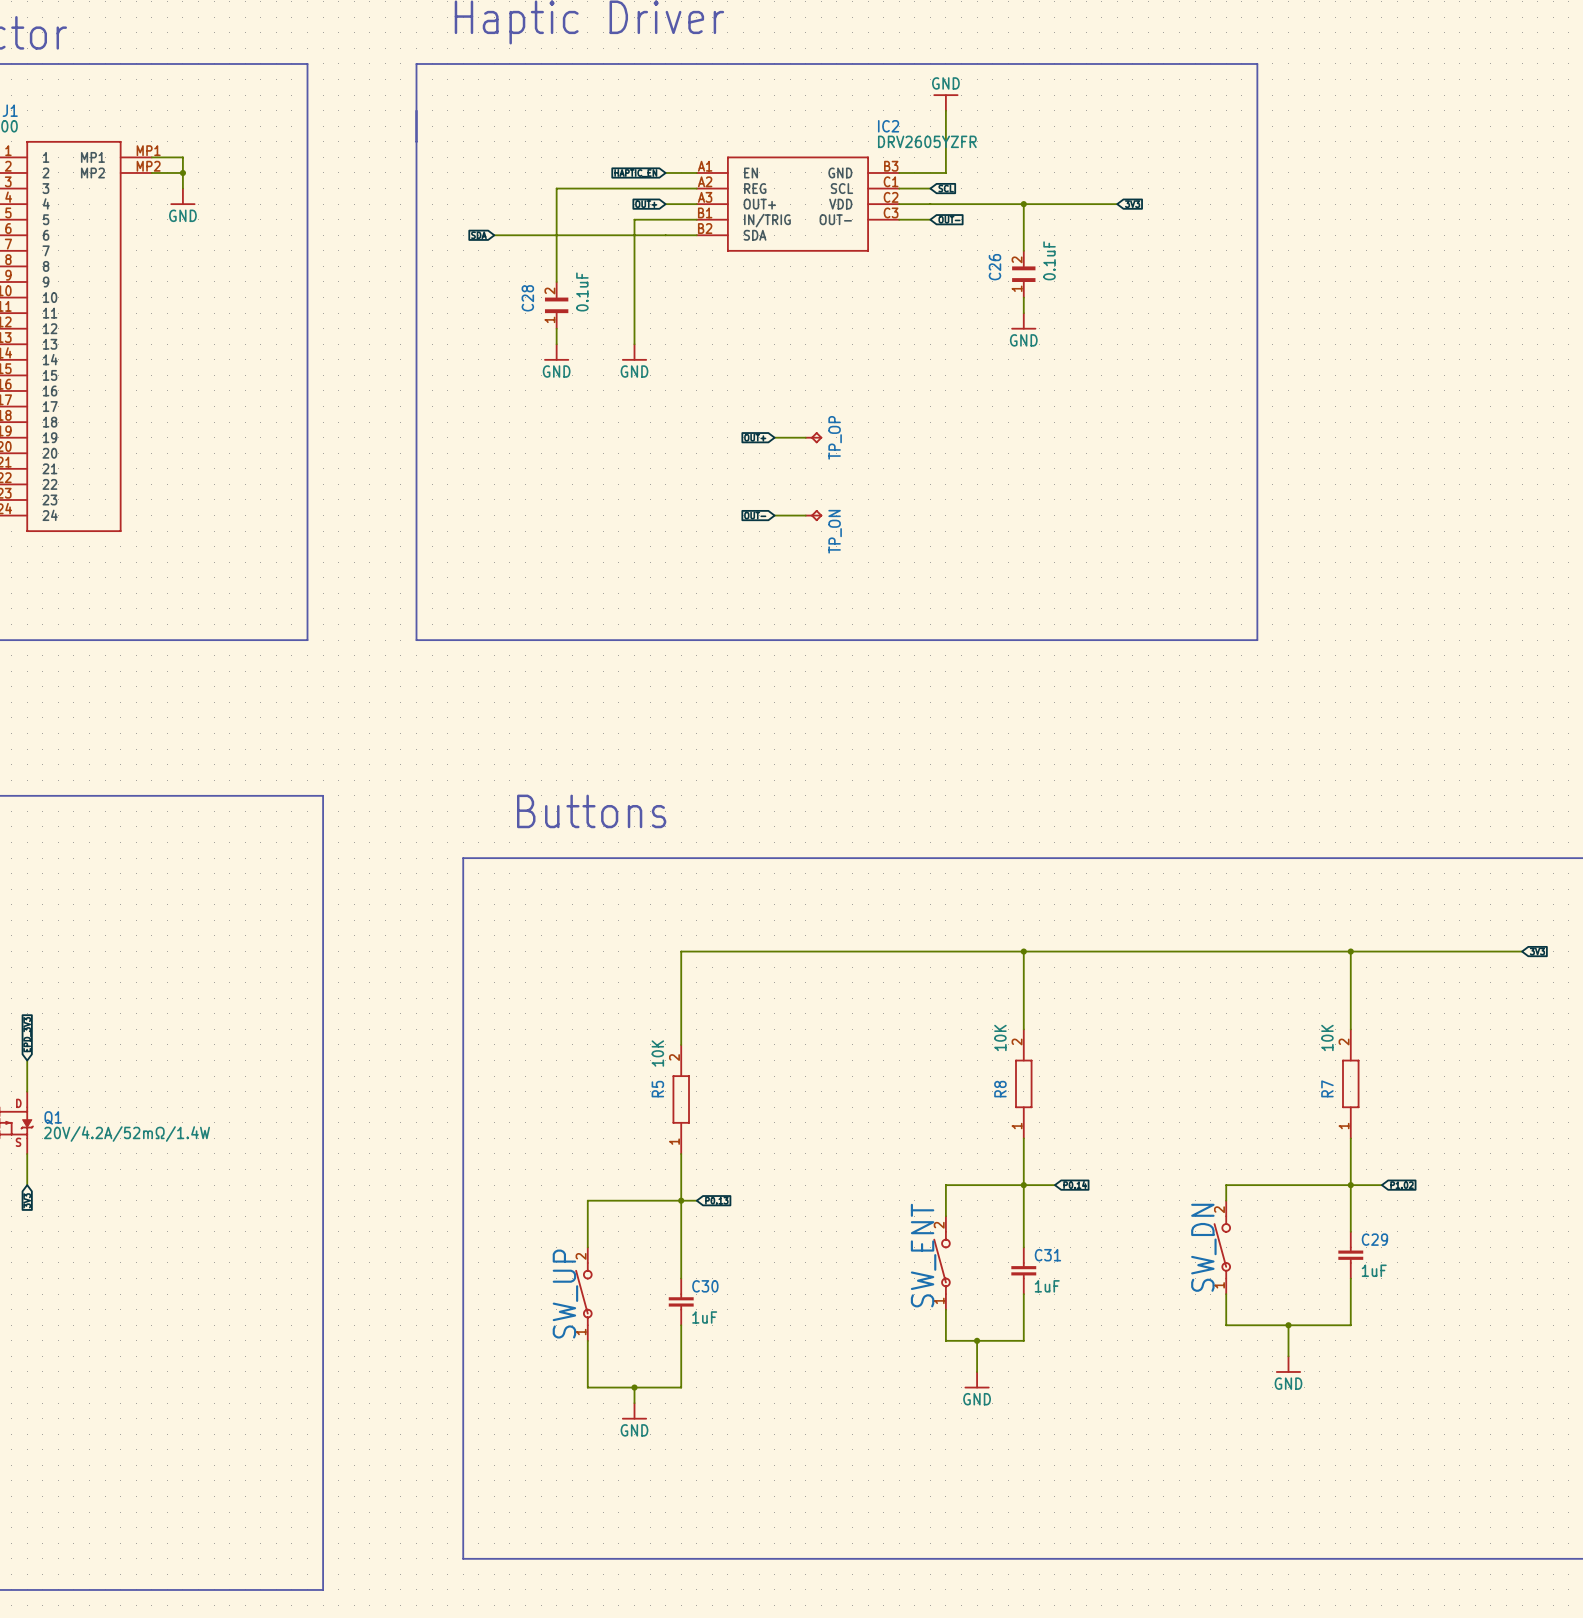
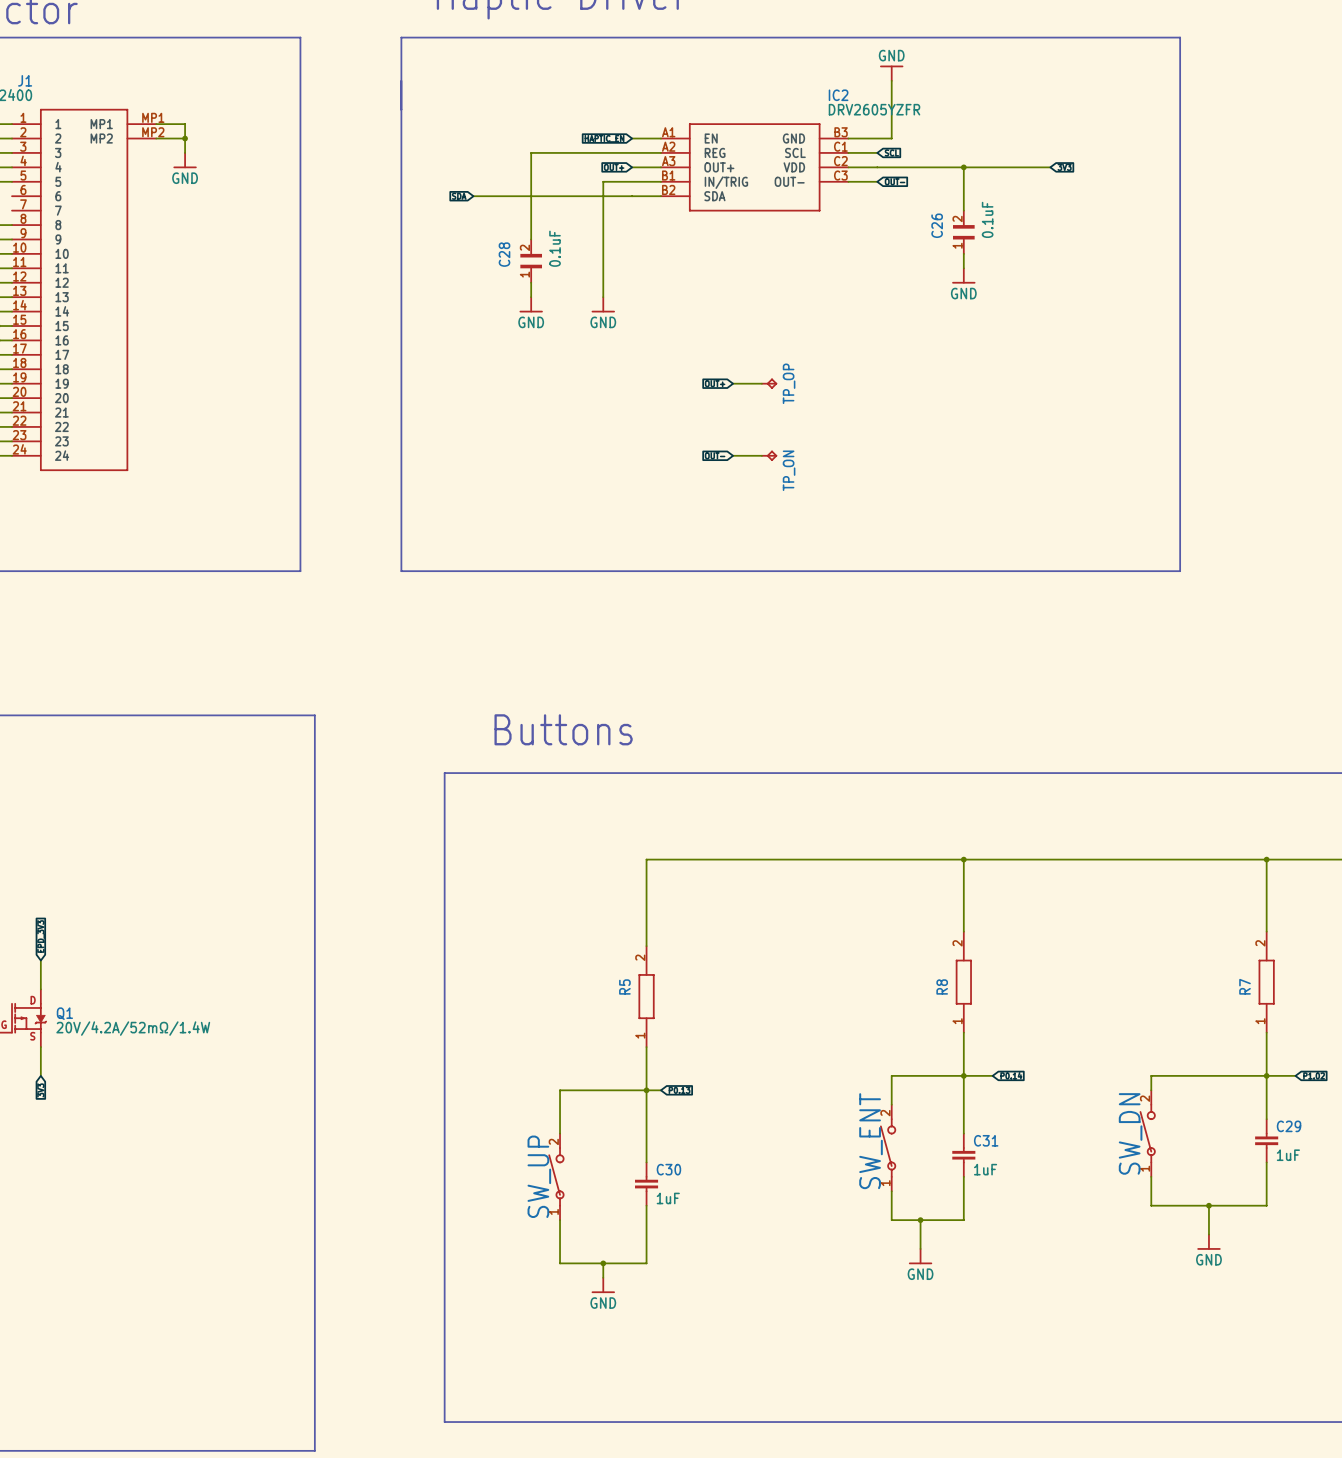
R8 value: 10K (1000, 1037) -> none
R7 value: 10K (1327, 1037) -> none
R5 value: 10K (657, 1053) -> none

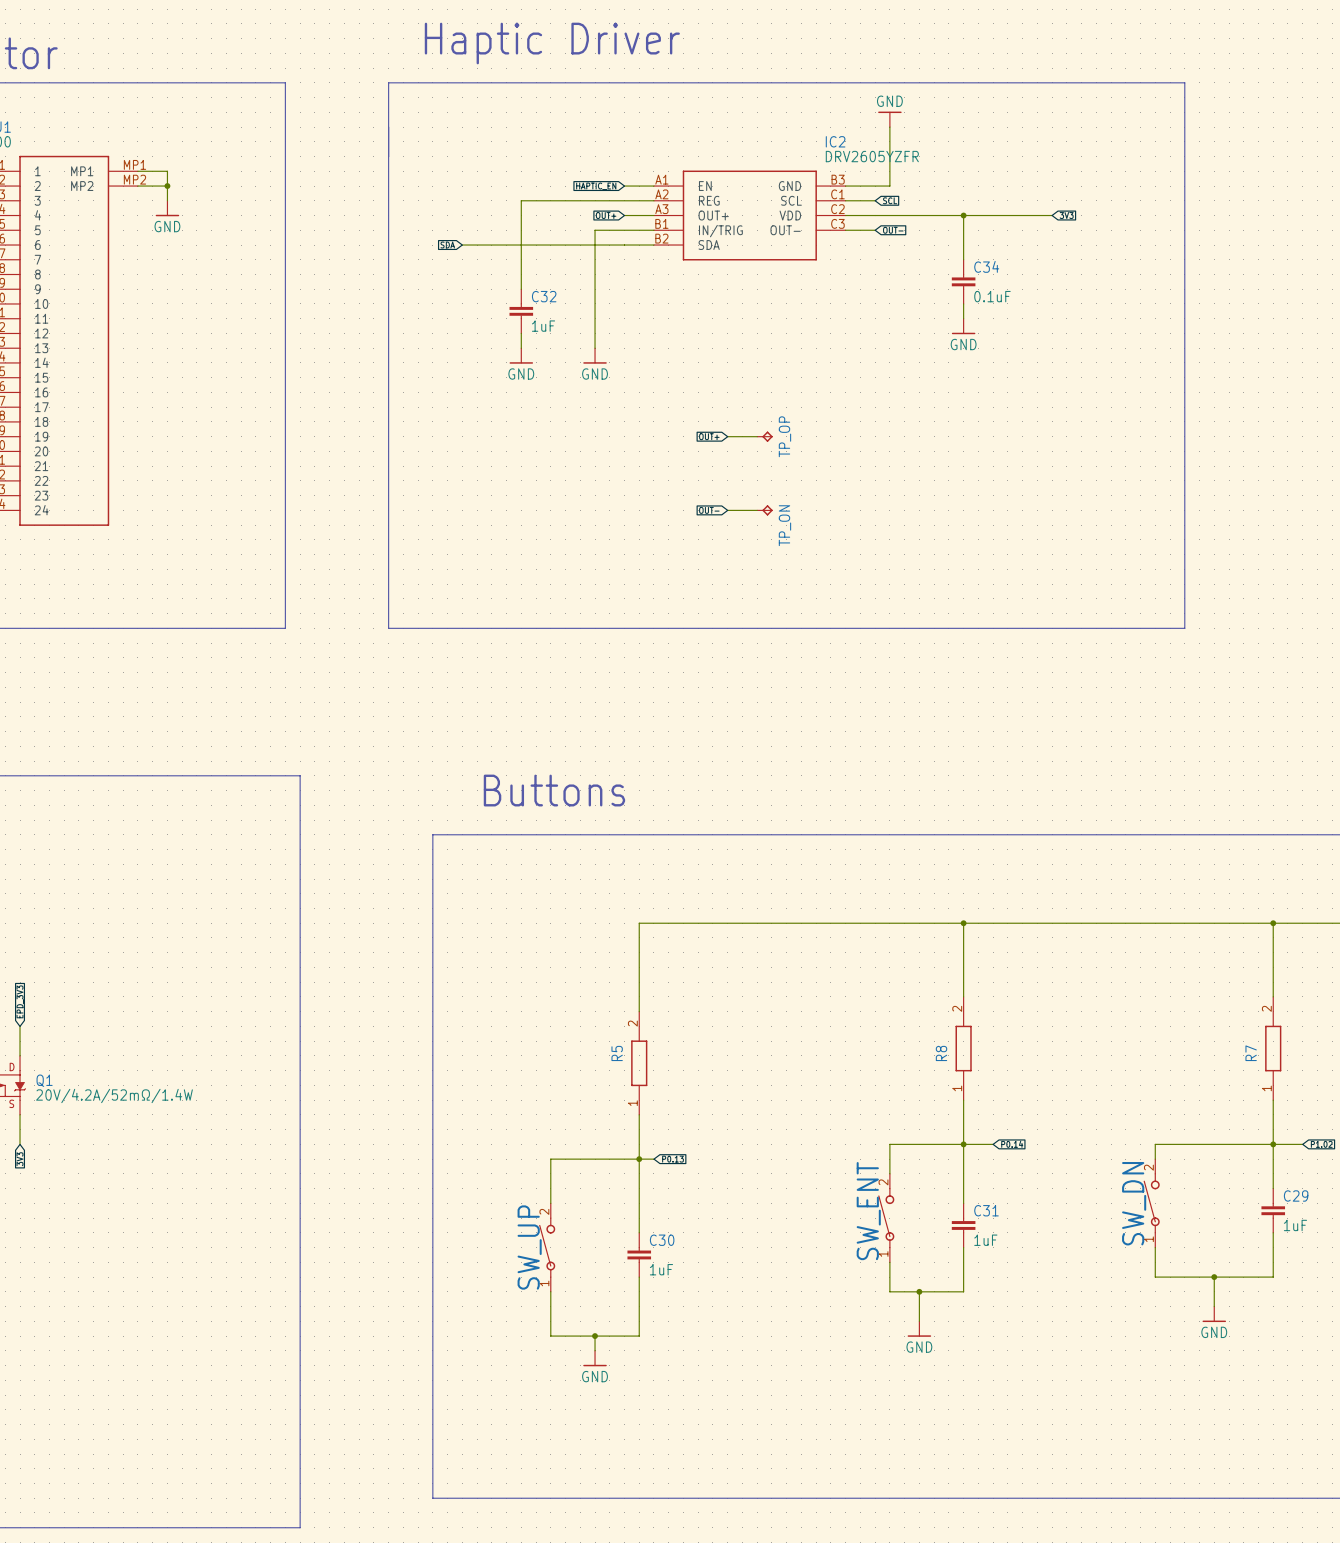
C26: 0.1uF (963, 232) -> none
C34: none -> 0.1uF (963, 281)
C28: 0.1uF (531, 261) -> none
C32: none -> 1uF (521, 311)

